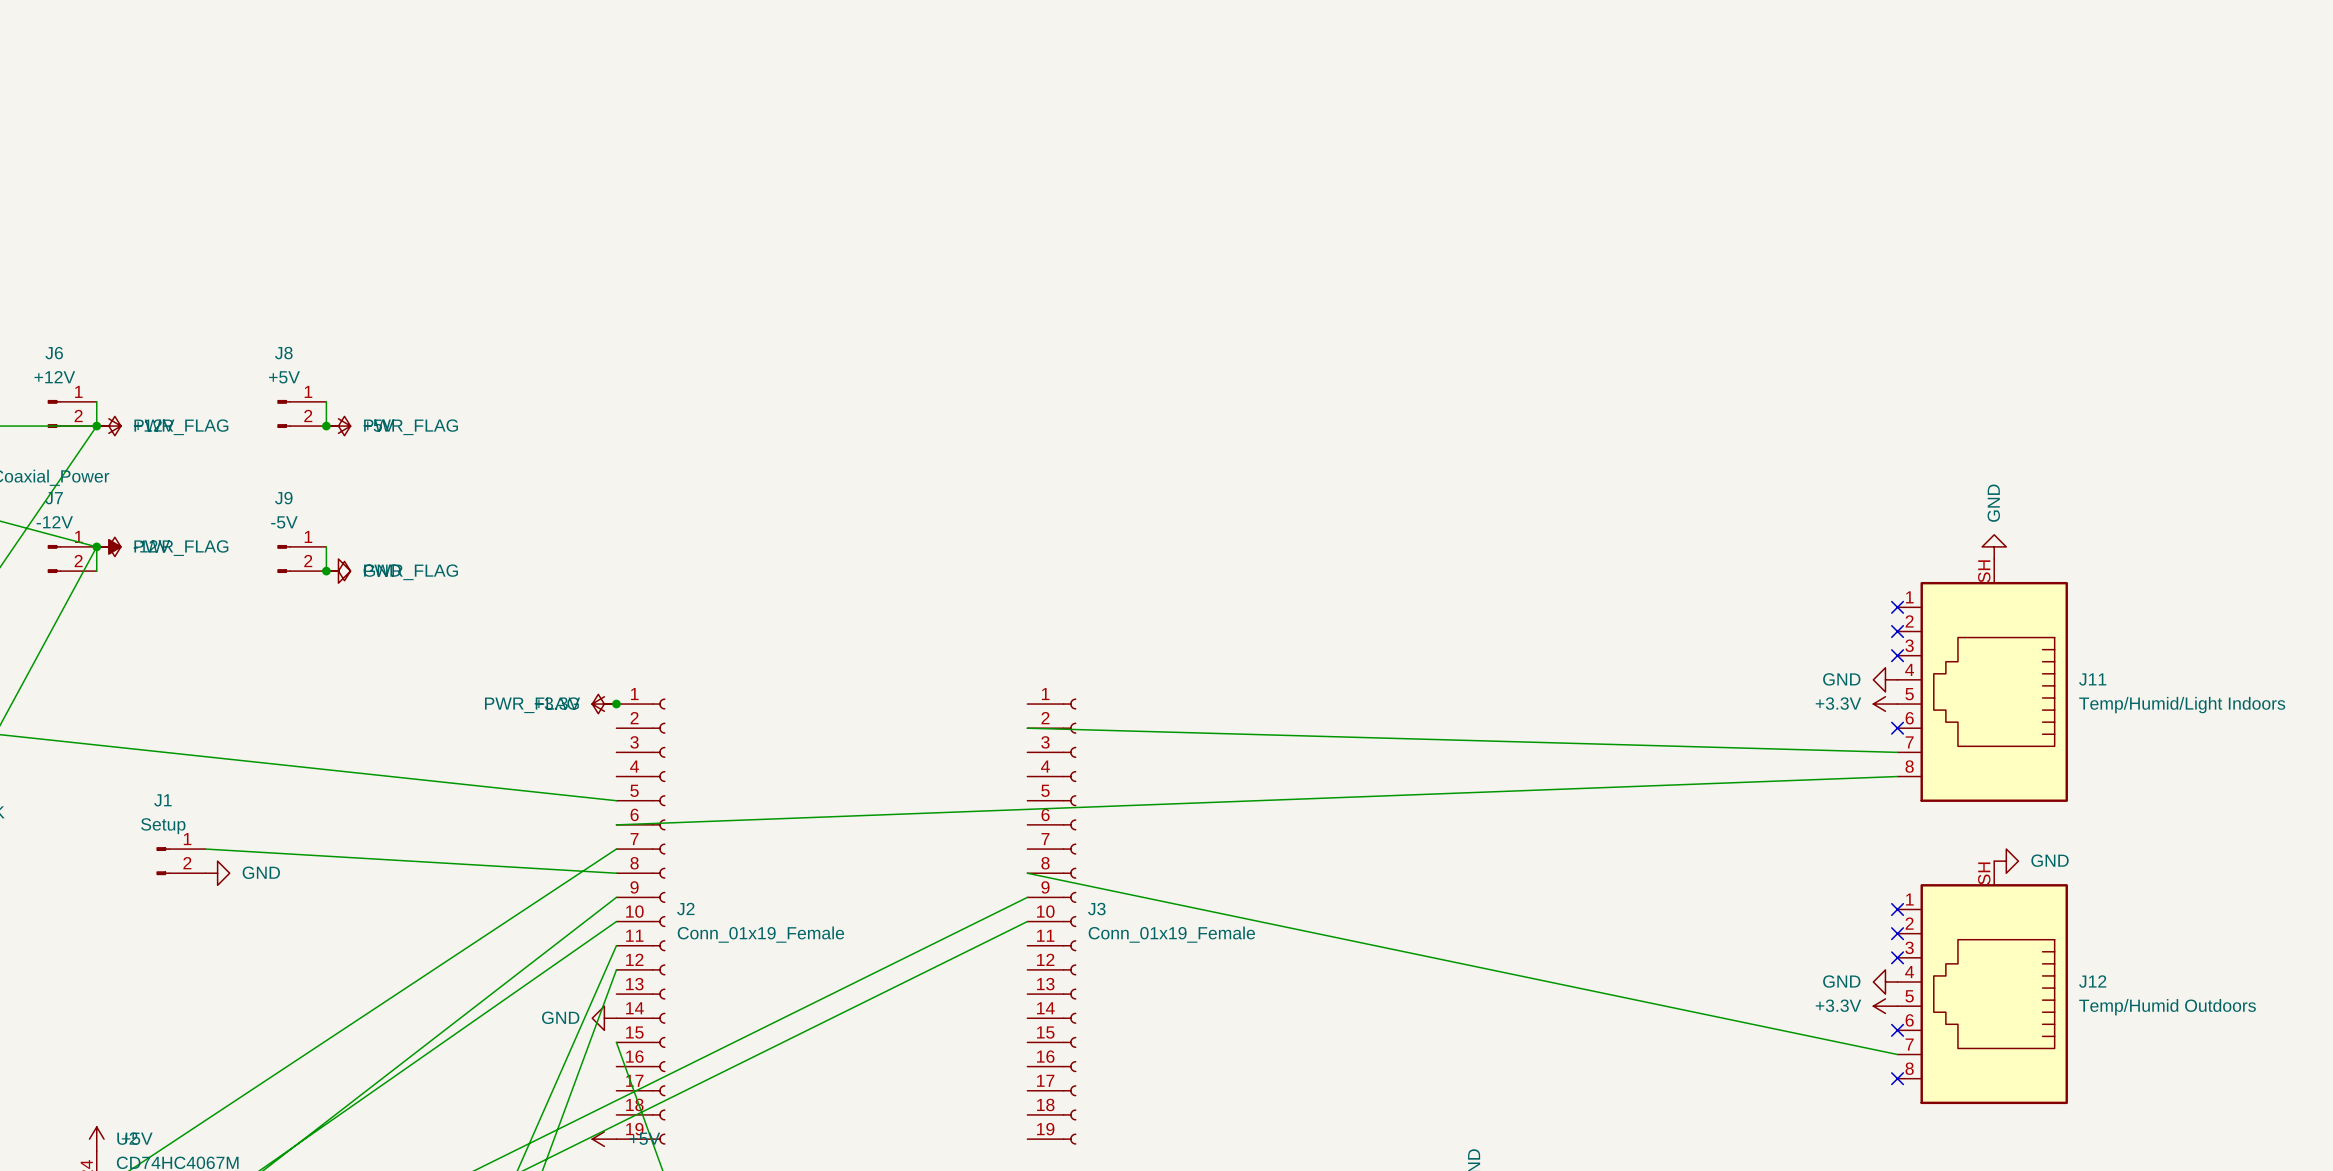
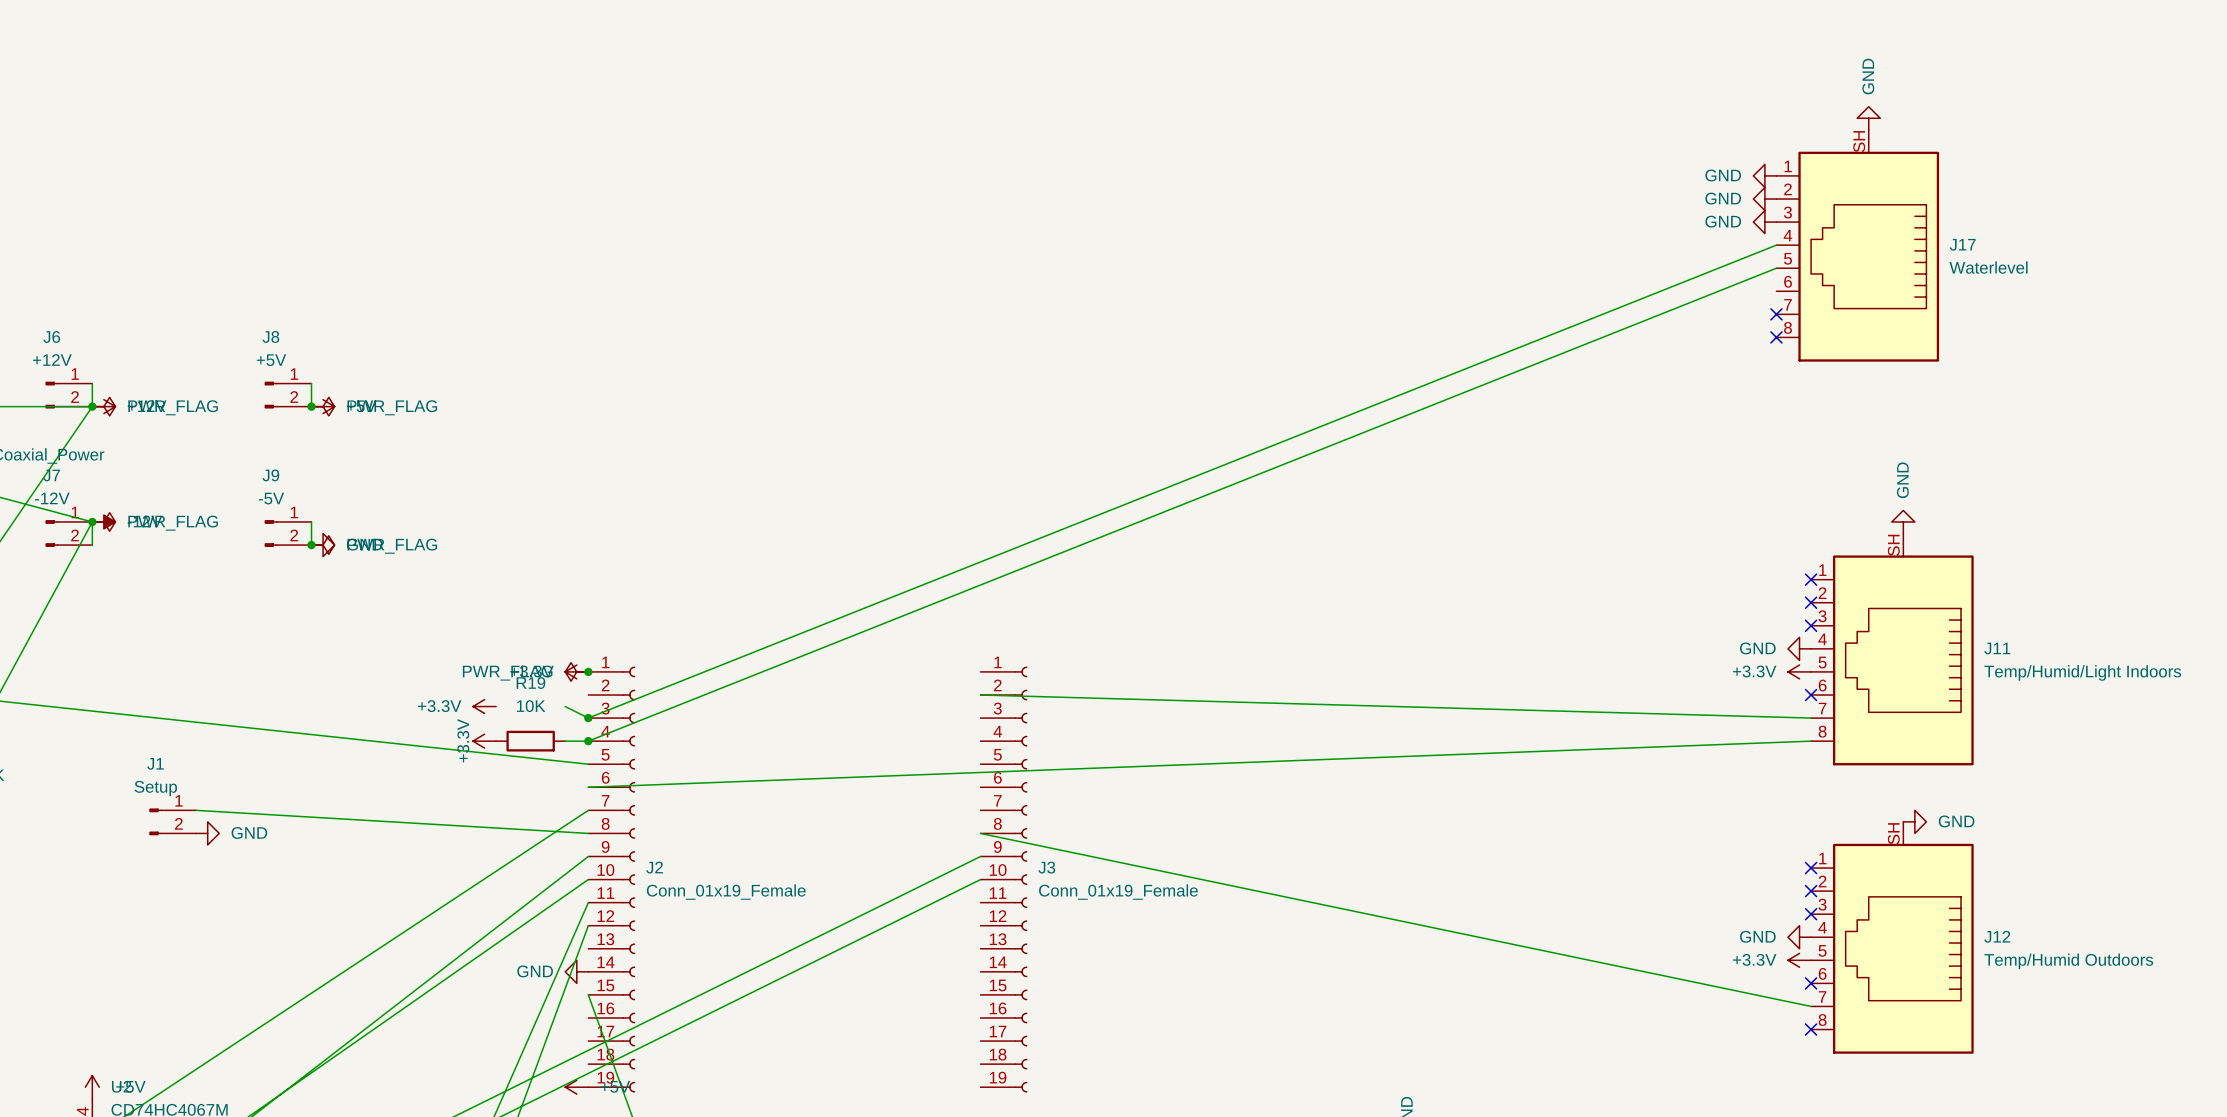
power symbol: none -> GND (1868, 118)
power symbol: none -> GND (1764, 175)
power symbol: none -> GND (1764, 199)
power symbol: none -> GND (1764, 222)
wire: none -> (1776, 245) (588, 718) (565, 706)
J17: none -> Waterlevel (1857, 245)
wire: none -> (1776, 268) (588, 741) (565, 741)
no-connect mark: none -> (1776, 314)
no-connect mark: none -> (1776, 337)
power symbol: none -> +3.3V (484, 706)
junction: none -> (588, 718)
power symbol: none -> +3.3V (484, 741)
R19: none -> 10K (530, 741)
junction: none -> (588, 741)

